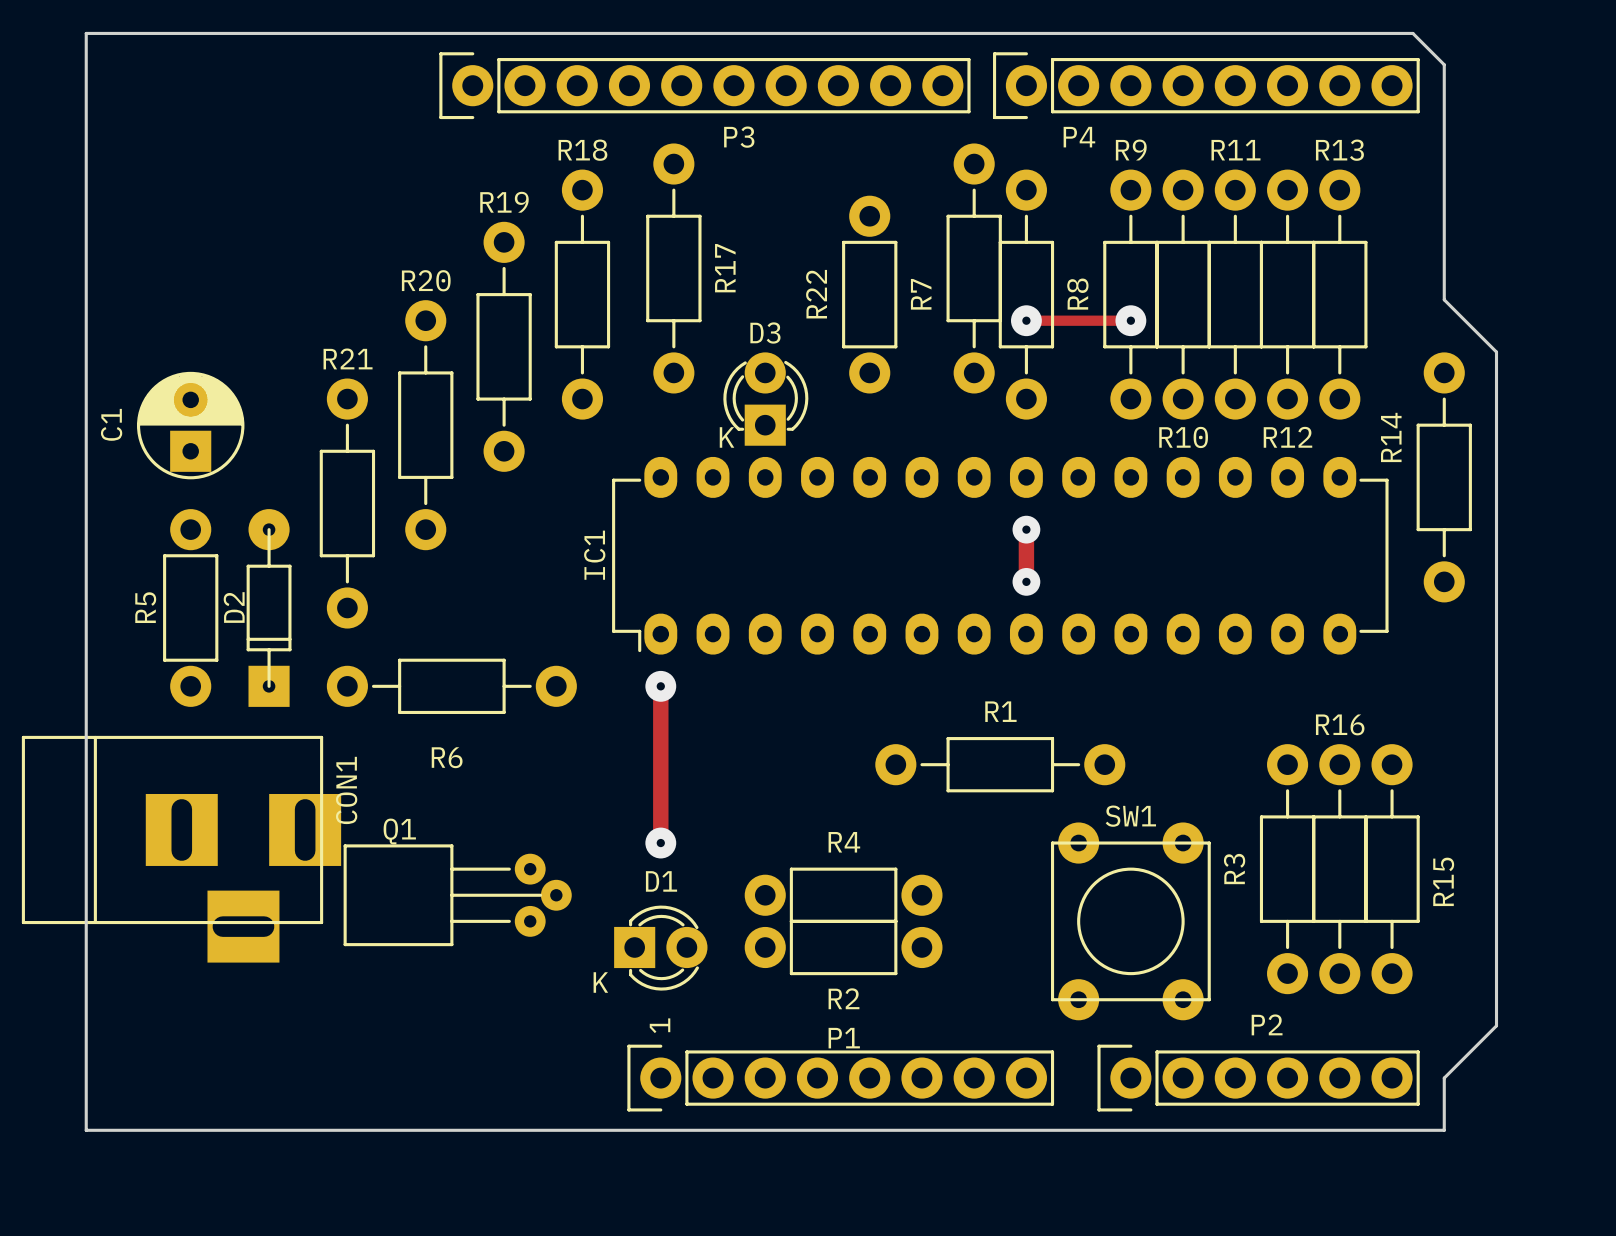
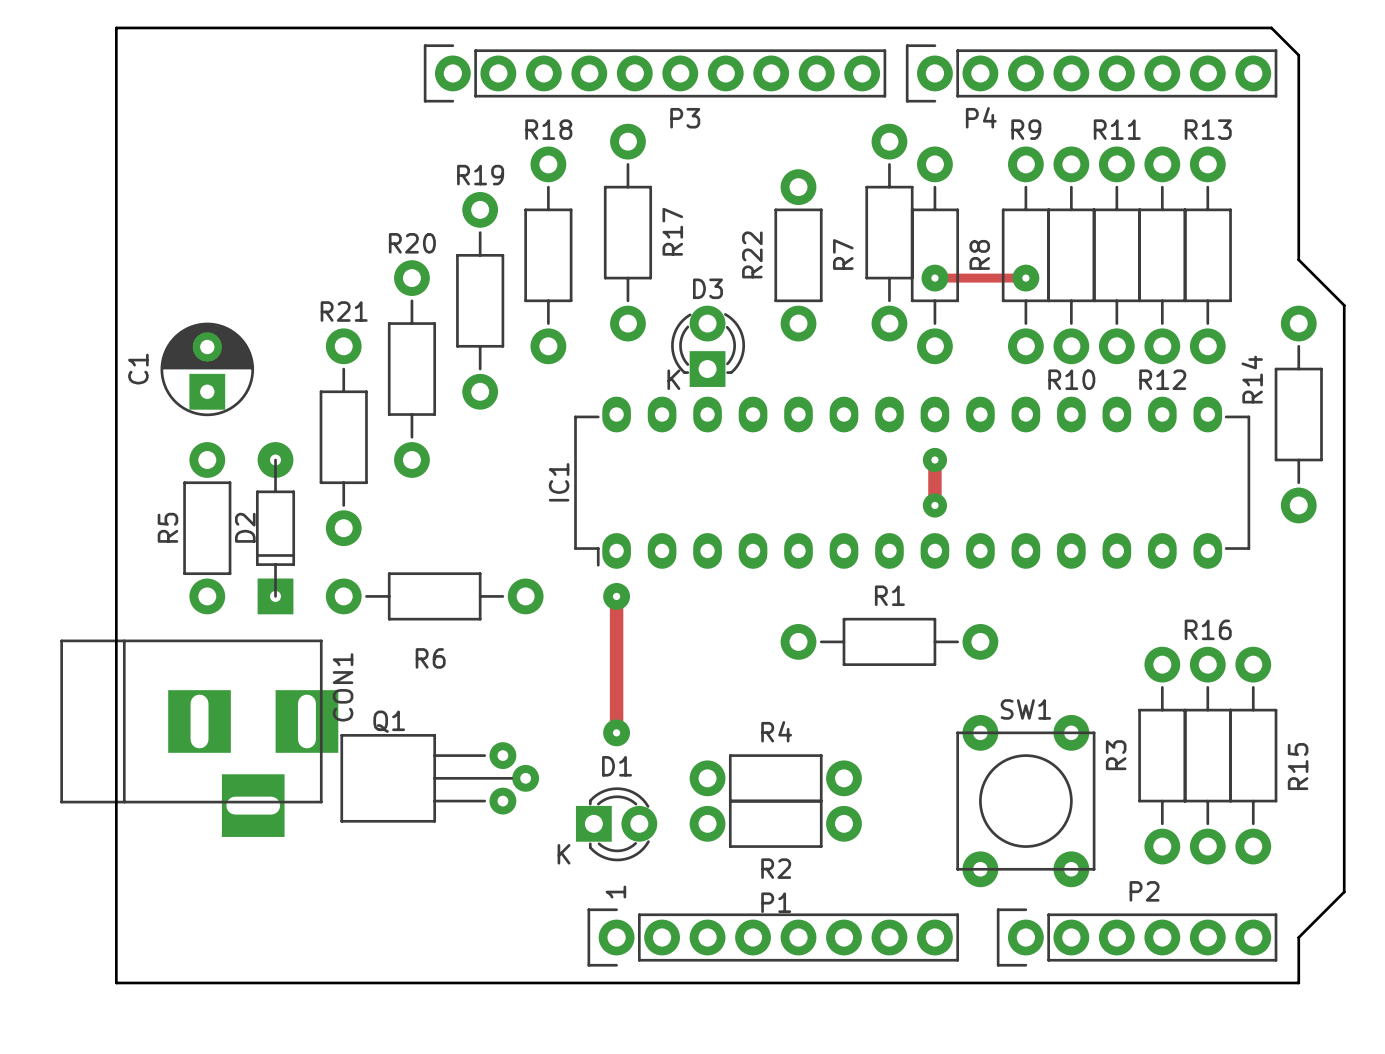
R1 position: (1000, 764) -> (889, 641)

